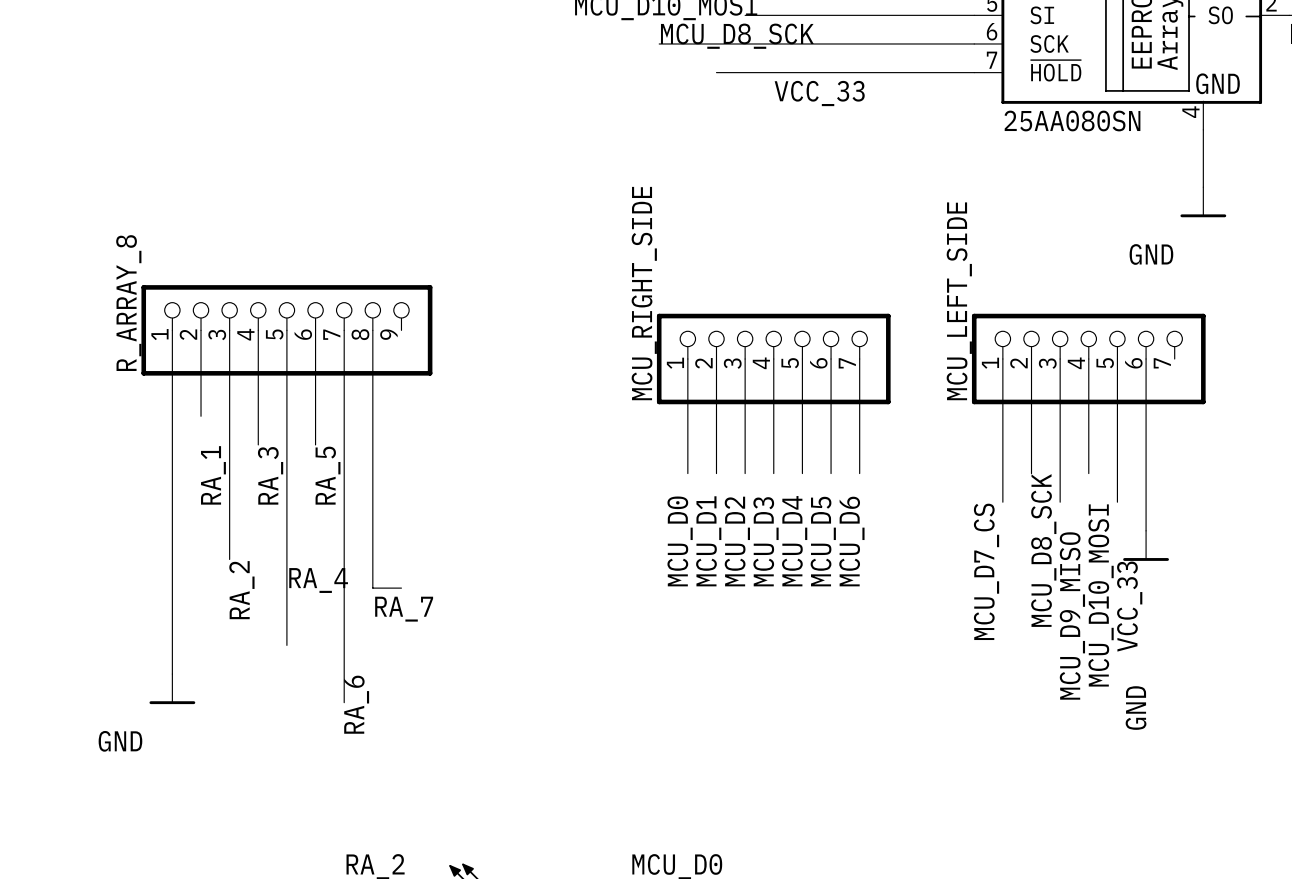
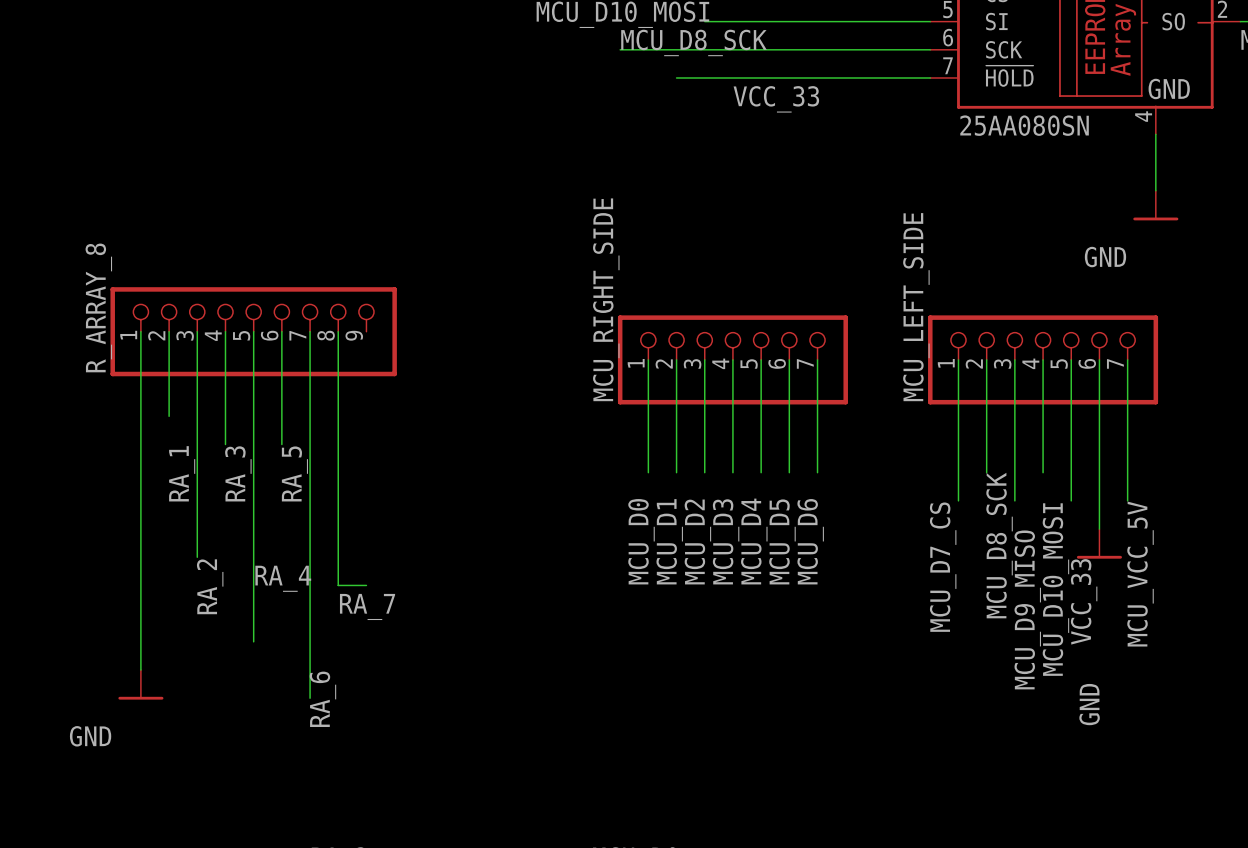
wire: none -> (1127, 359) (1127, 500)
label: none -> MCU_VCC_5V (1140, 574)

